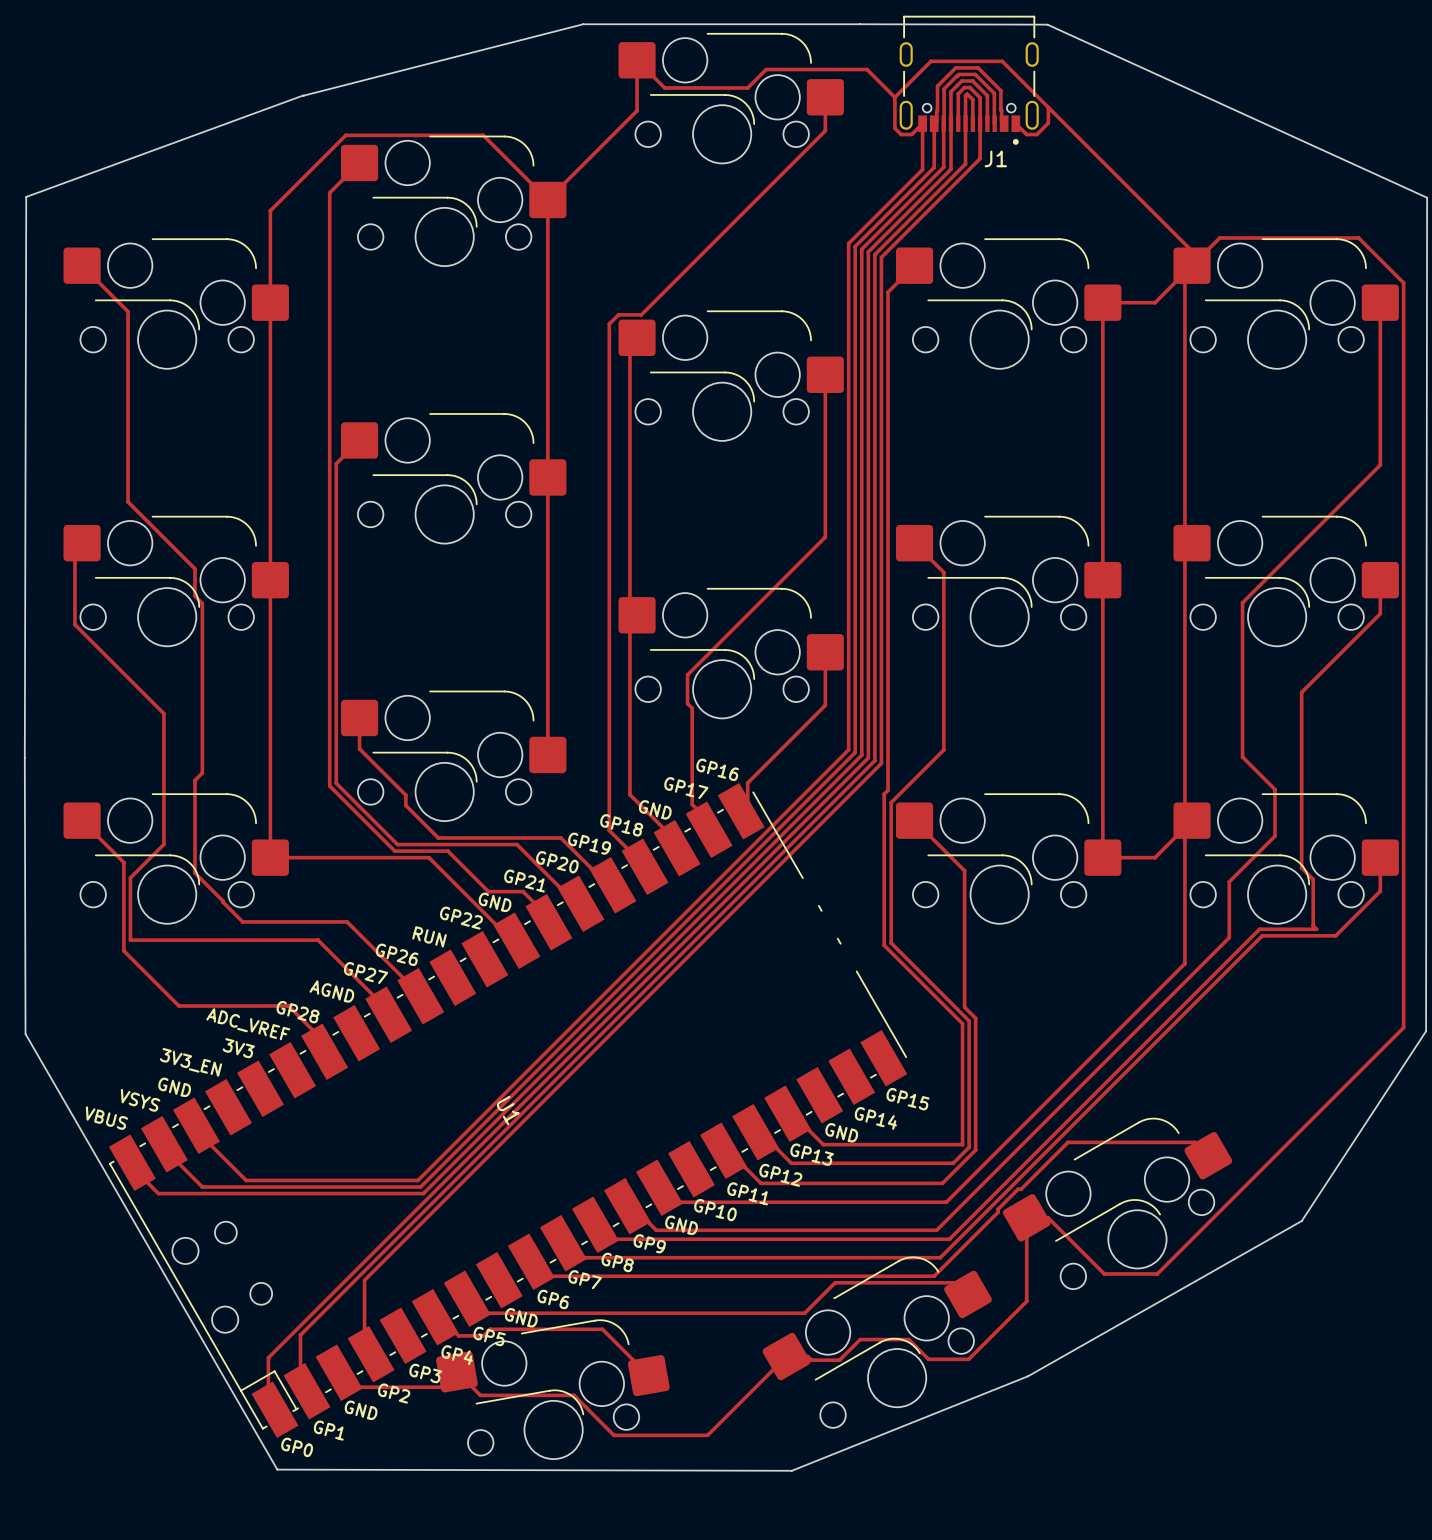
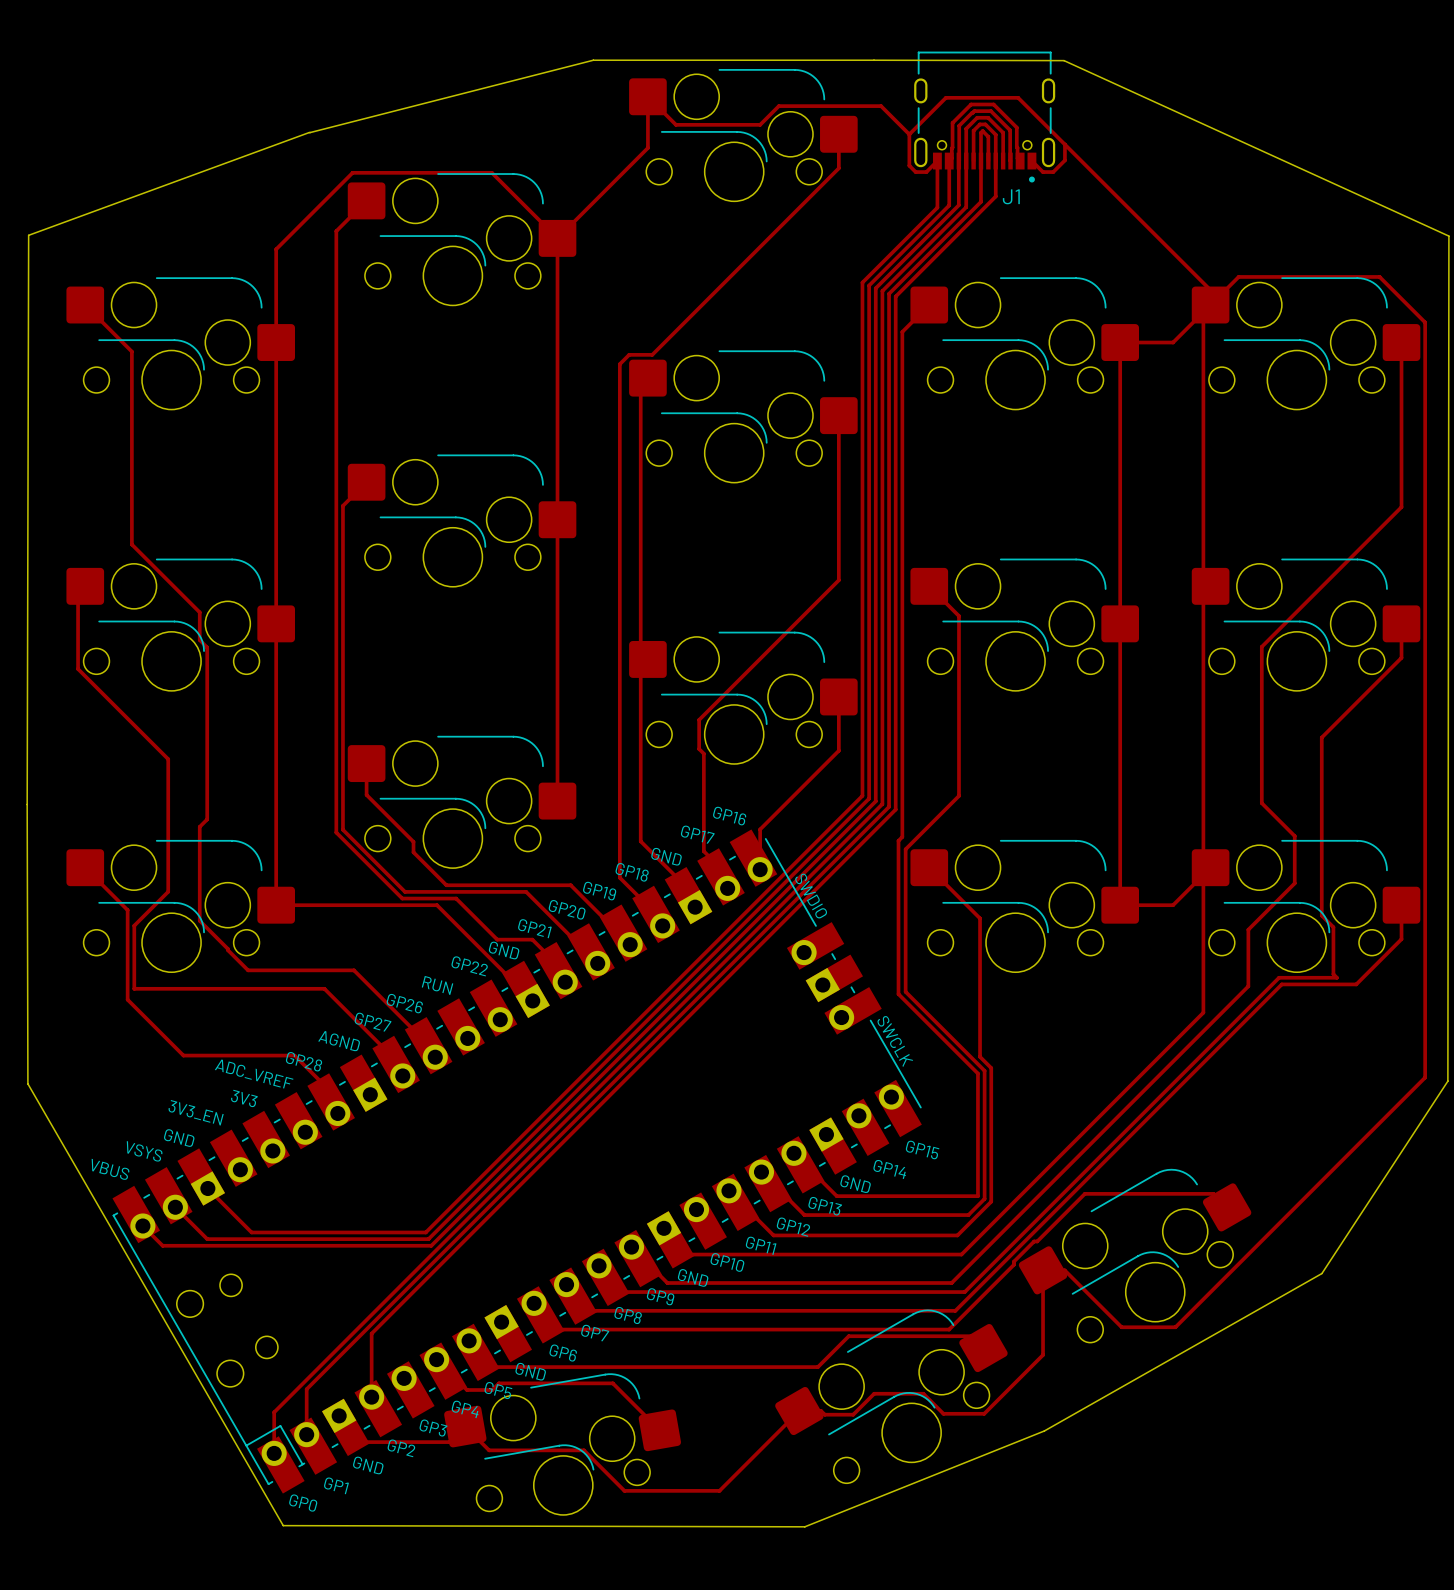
U1: (508, 1110) -> none
part: none -> (517, 1161)

